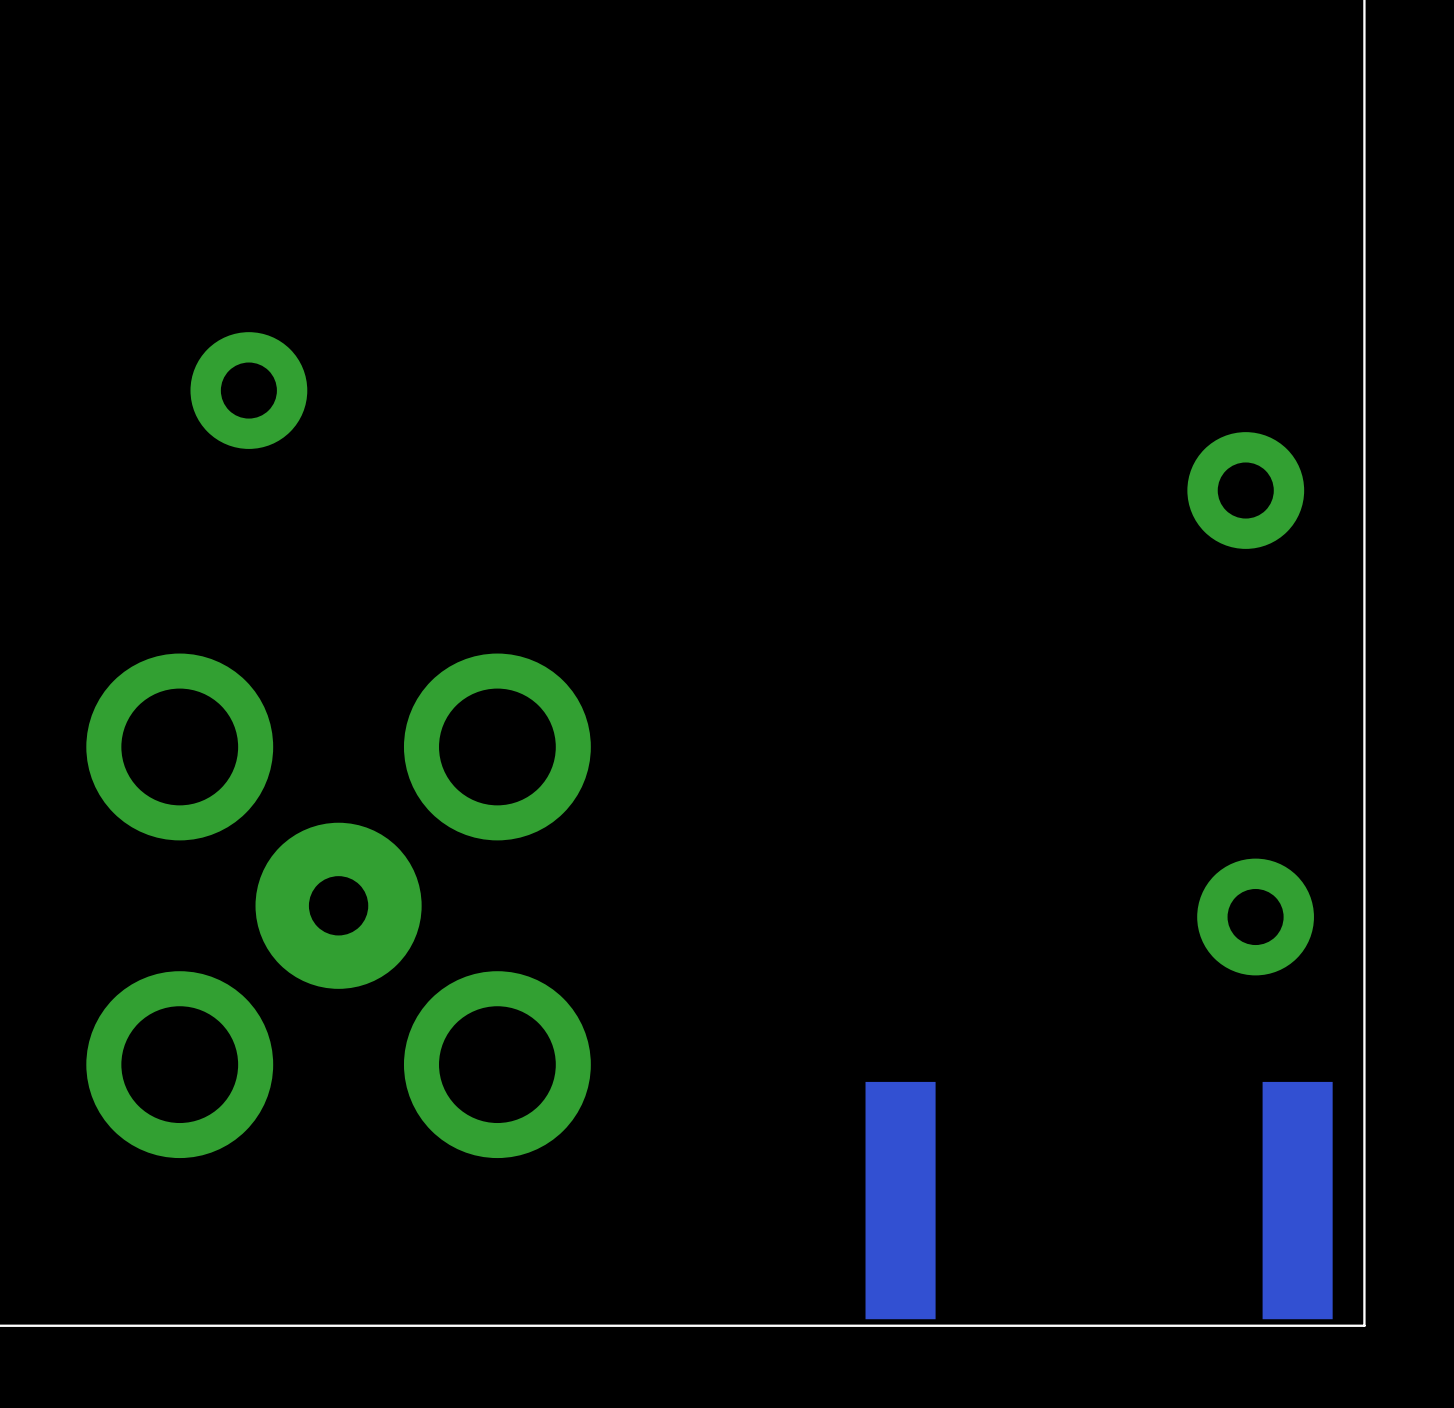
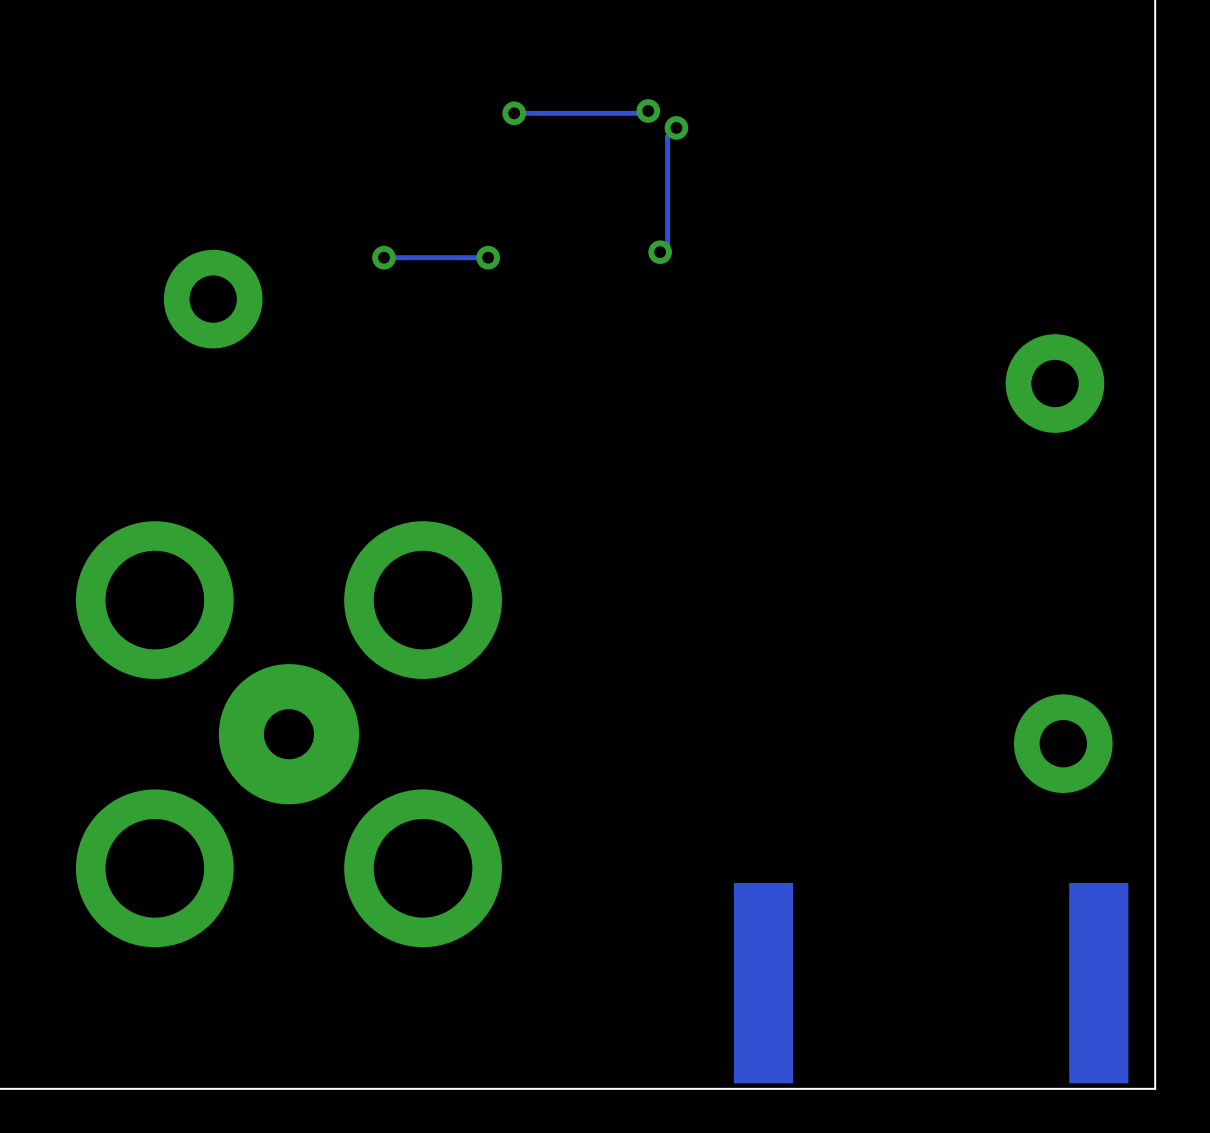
track: none -> (648, 110) (645, 113) (514, 113)
via: none -> (648, 110)
via: none -> (514, 113)
track: none -> (676, 127) (667, 136) (667, 244) (660, 252)
via: none -> (676, 127)
via: none -> (660, 252)
via: none -> (384, 257)
track: none -> (488, 257) (384, 257)
via: none -> (488, 257)

